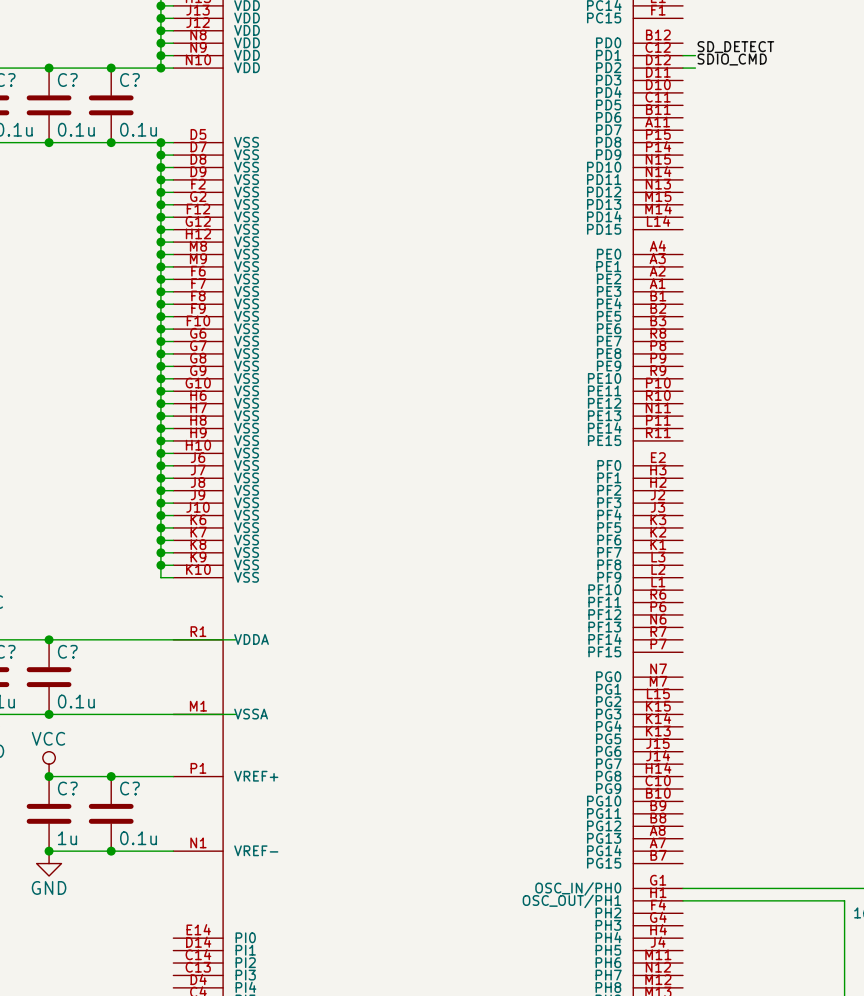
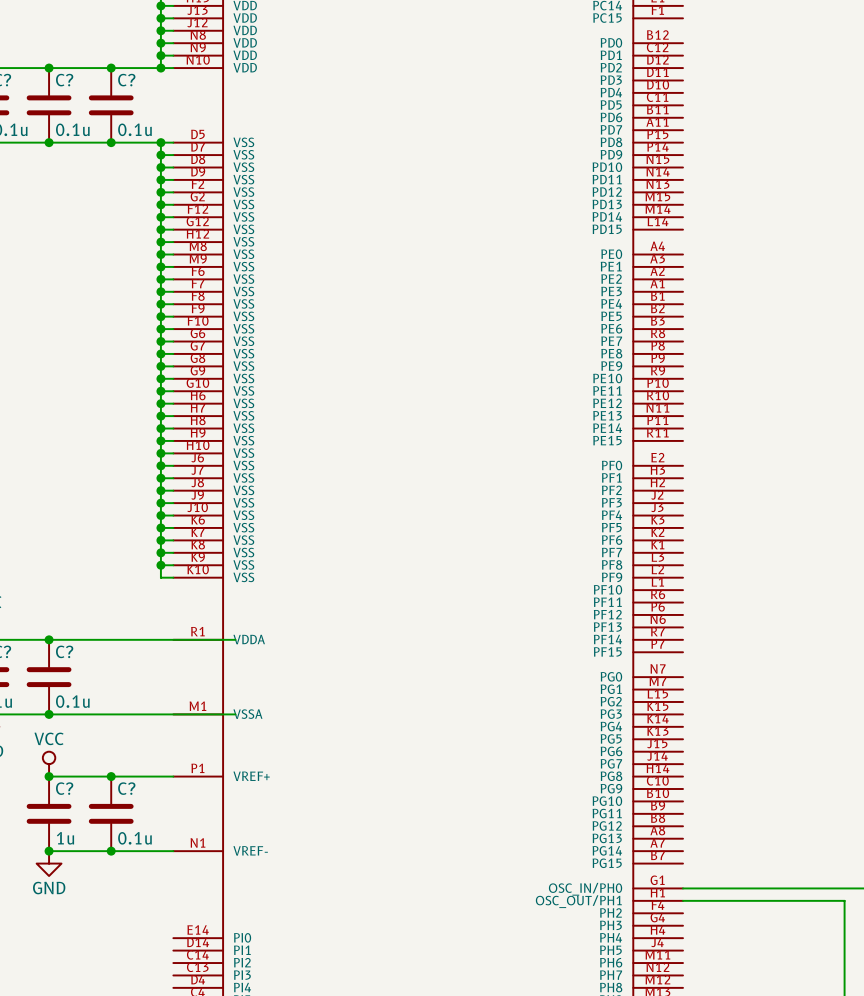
label: SD_DETECT (735, 47) -> none
wire: (682, 55) (695, 55) -> none
label: SDIO_CMD (732, 59) -> none
wire: (682, 68) (695, 68) -> none

